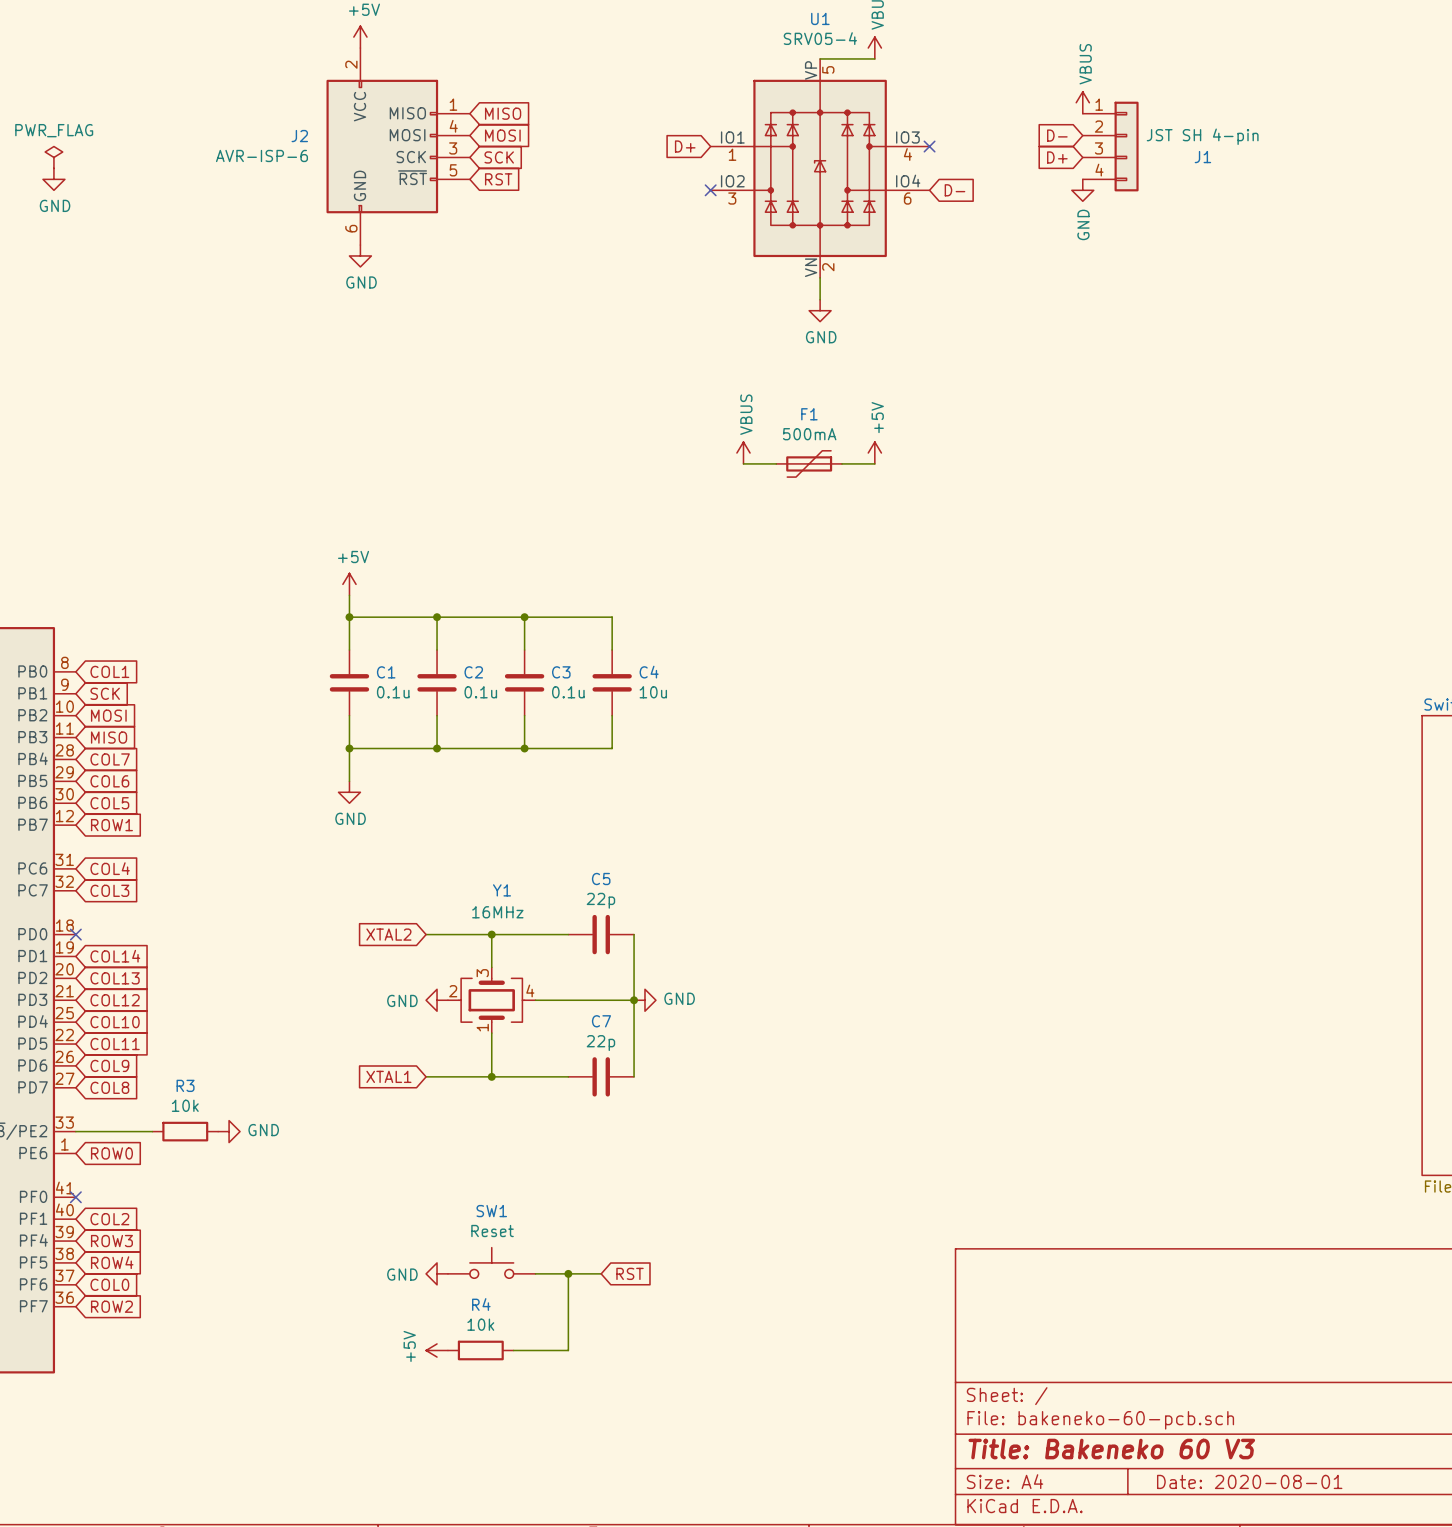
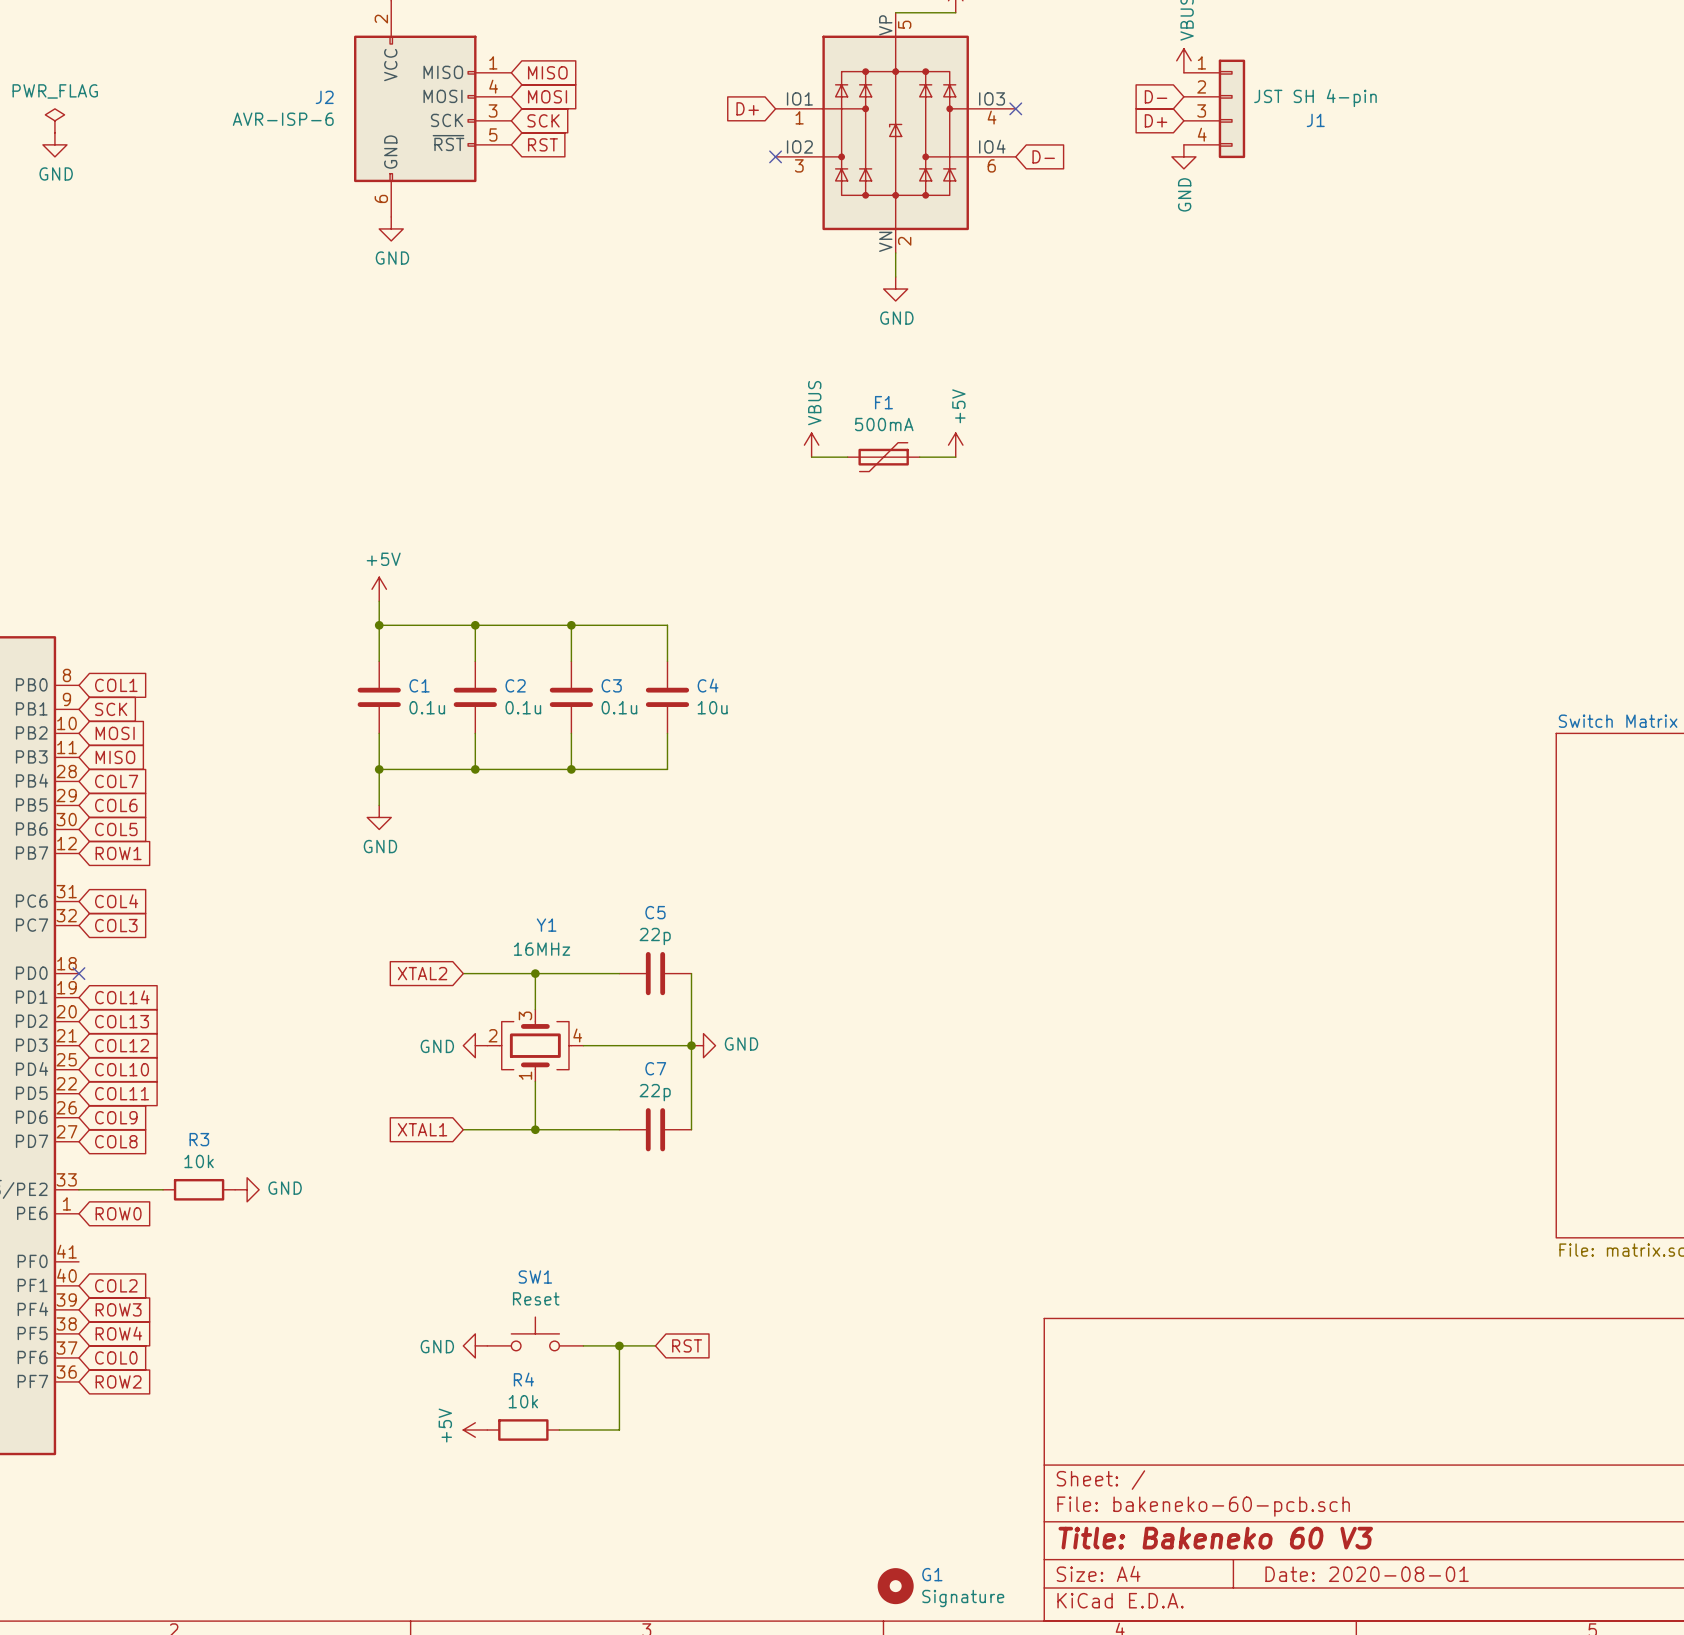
no-connect mark: (75, 1197) -> none
G1: none -> Signature (895, 1586)

